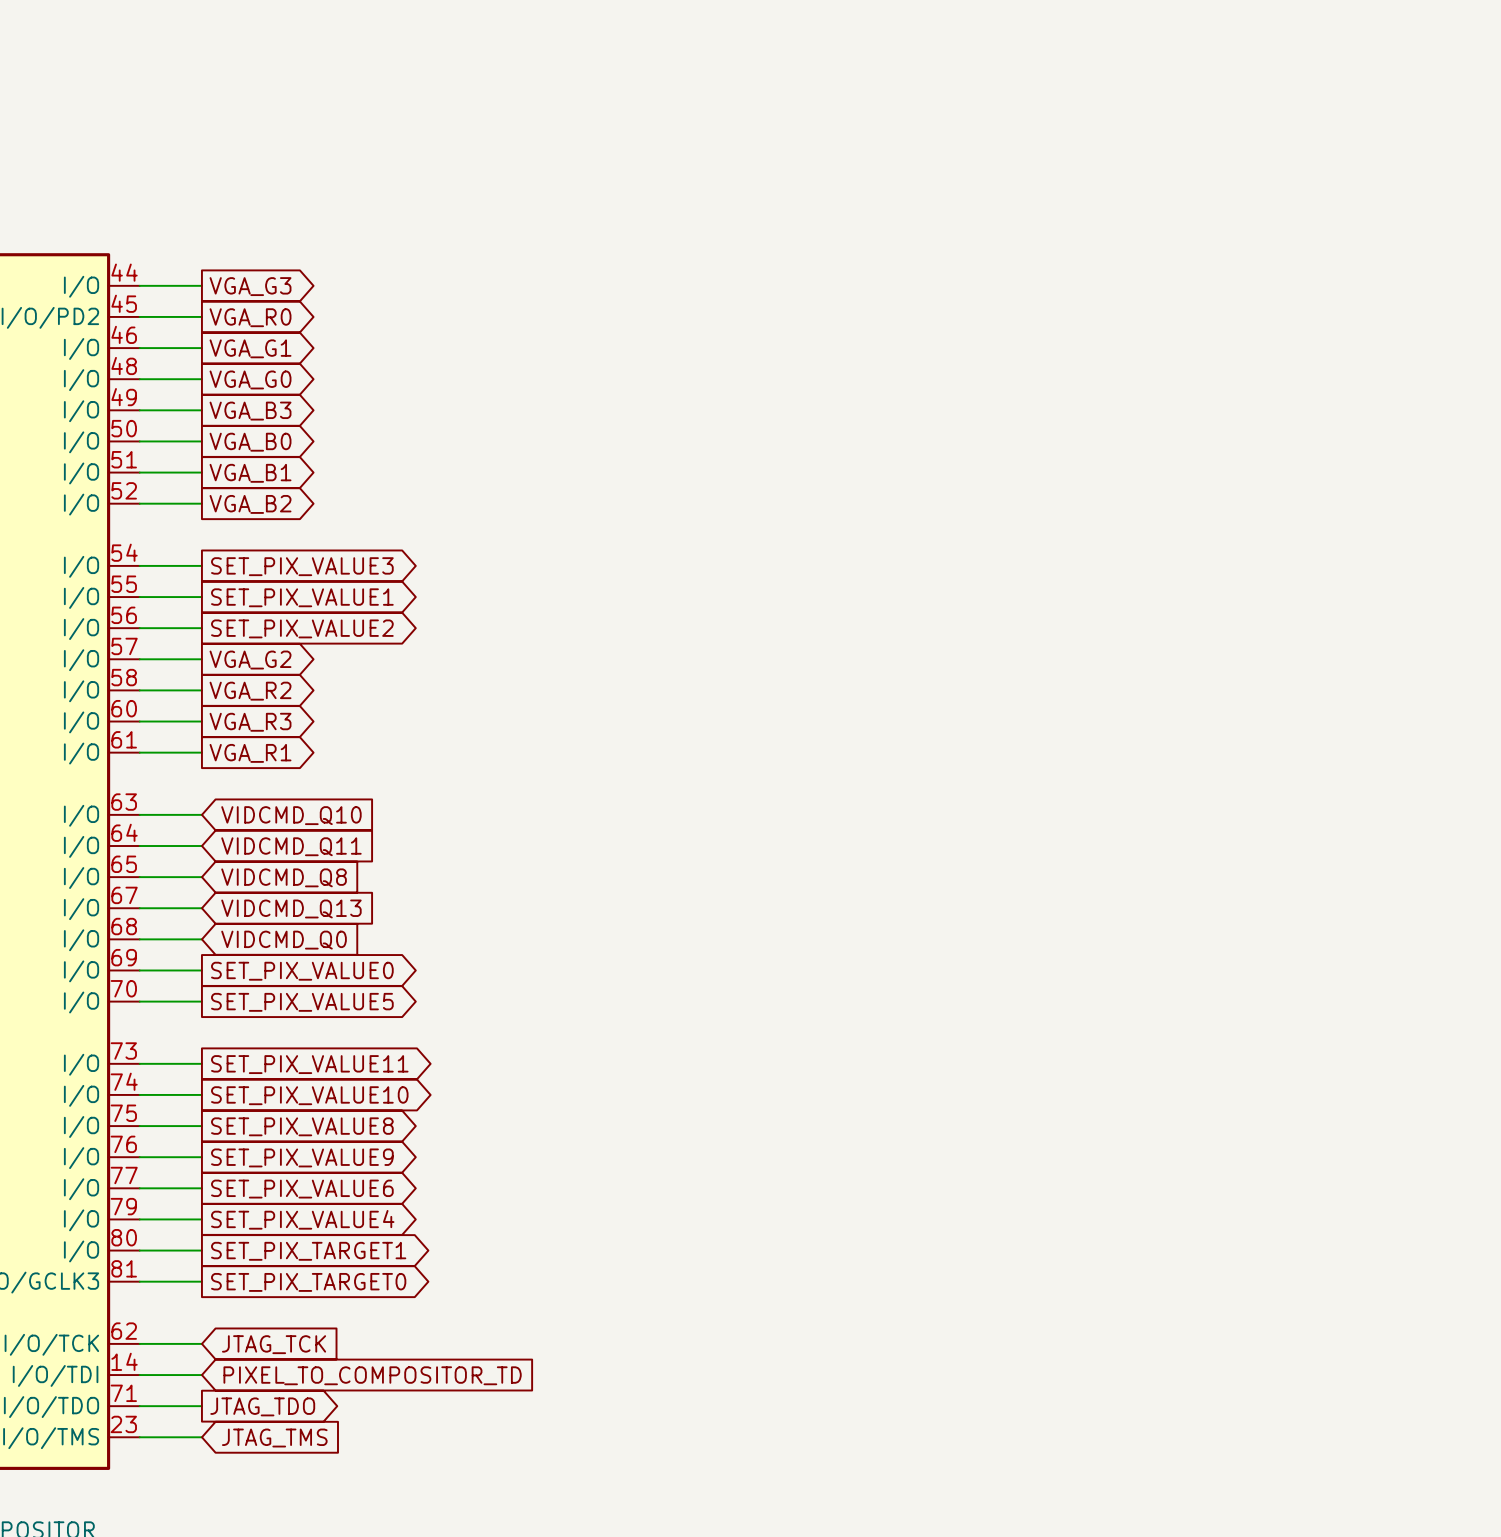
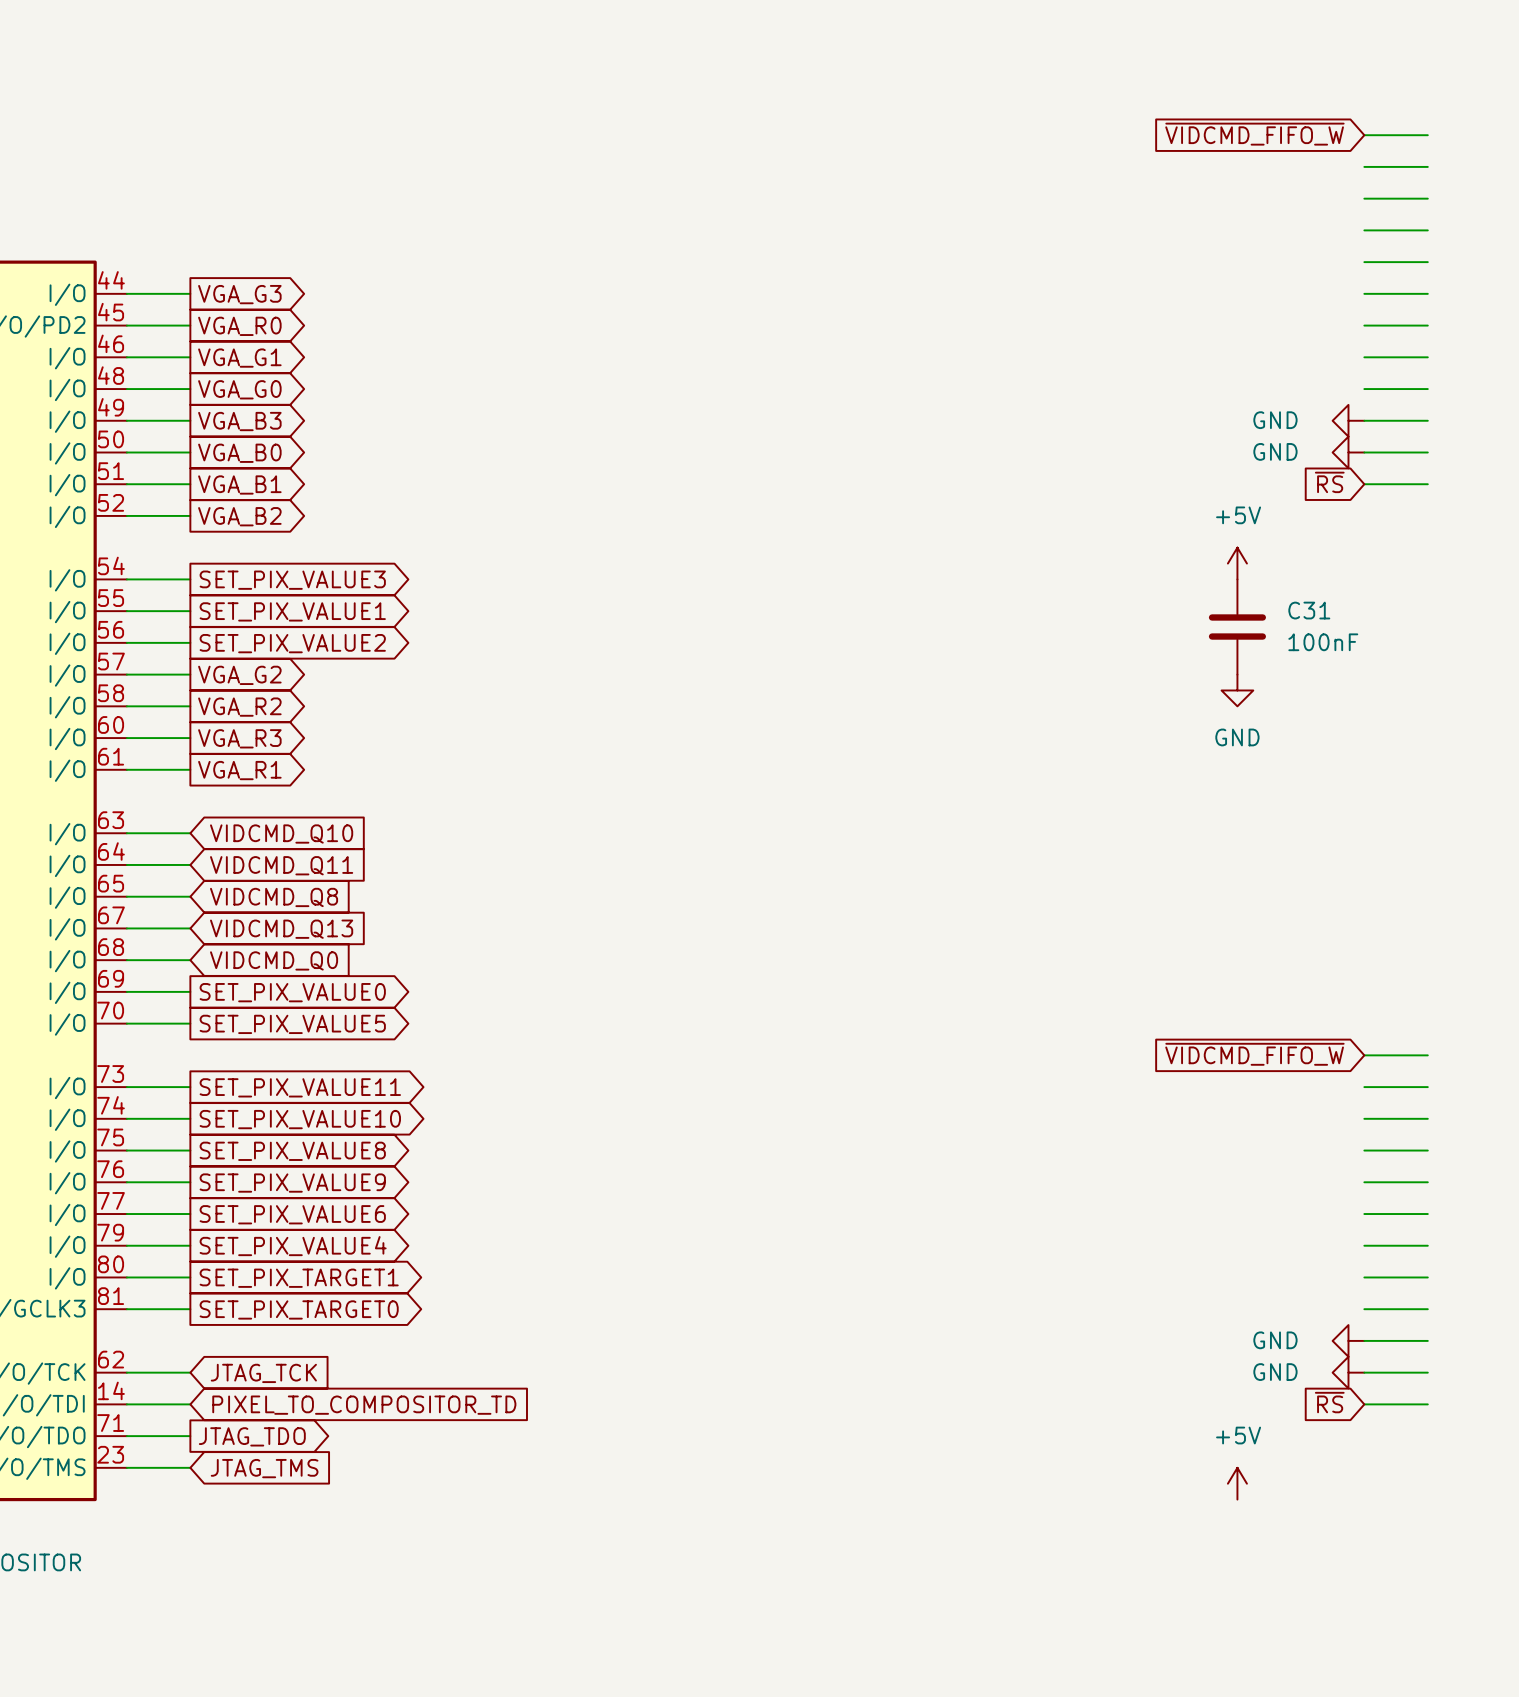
global label: none -> ~{VIDCMD_FIFO_W} (1254, 134)
wire: none -> (1364, 135) (1427, 135)
wire: none -> (1364, 166) (1427, 166)
wire: none -> (1364, 198) (1427, 198)
wire: none -> (1364, 230) (1427, 230)
wire: none -> (1364, 262) (1427, 262)
wire: none -> (1364, 293) (1427, 293)
wire: none -> (1364, 325) (1427, 325)
wire: none -> (1364, 357) (1427, 357)
wire: none -> (1364, 389) (1427, 389)
power symbol: none -> GND (1348, 420)
wire: none -> (1364, 420) (1427, 420)
power symbol: none -> GND (1348, 452)
wire: none -> (1364, 452) (1427, 452)
global label: none -> ~{RS} (1329, 482)
wire: none -> (1364, 484) (1427, 484)
power symbol: none -> +5V (1237, 563)
C31: none -> 100nF (1237, 627)
power symbol: none -> GND (1237, 690)
global label: none -> ~{VIDCMD_FIFO_W} (1254, 1054)
wire: none -> (1364, 1055) (1427, 1055)
wire: none -> (1364, 1087) (1427, 1087)
wire: none -> (1364, 1118) (1427, 1118)
wire: none -> (1364, 1150) (1427, 1150)
wire: none -> (1364, 1182) (1427, 1182)
wire: none -> (1364, 1214) (1427, 1214)
wire: none -> (1364, 1245) (1427, 1245)
wire: none -> (1364, 1277) (1427, 1277)
wire: none -> (1364, 1309) (1427, 1309)
power symbol: none -> GND (1348, 1340)
wire: none -> (1364, 1340) (1427, 1340)
power symbol: none -> GND (1348, 1372)
wire: none -> (1364, 1372) (1427, 1372)
global label: none -> ~{RS} (1329, 1402)
wire: none -> (1364, 1404) (1427, 1404)
power symbol: none -> +5V (1237, 1483)

